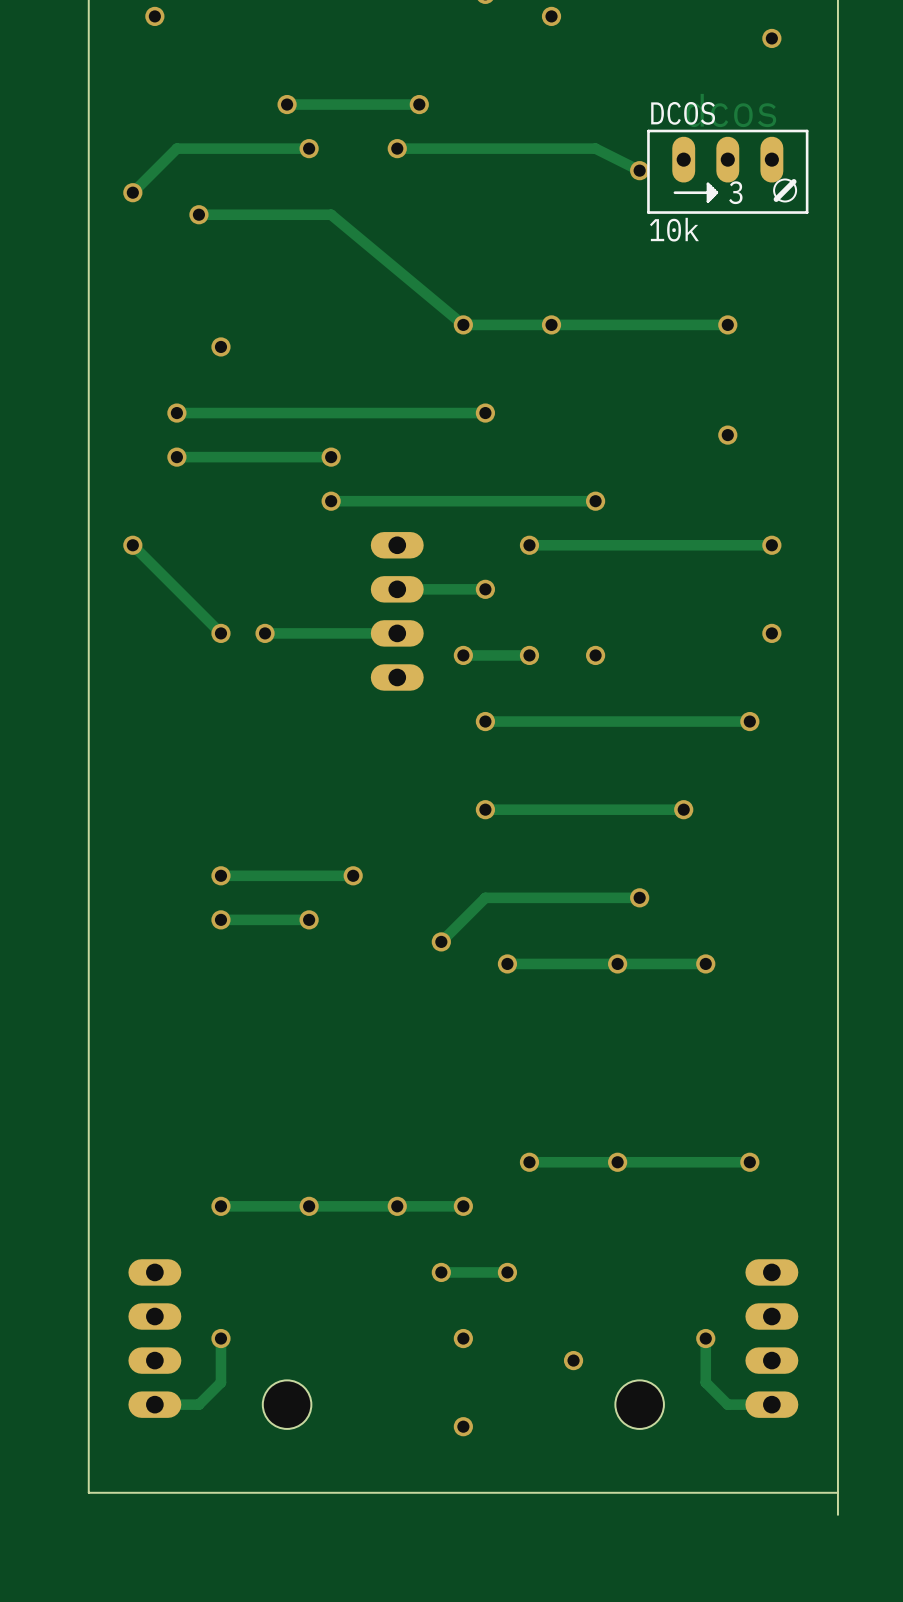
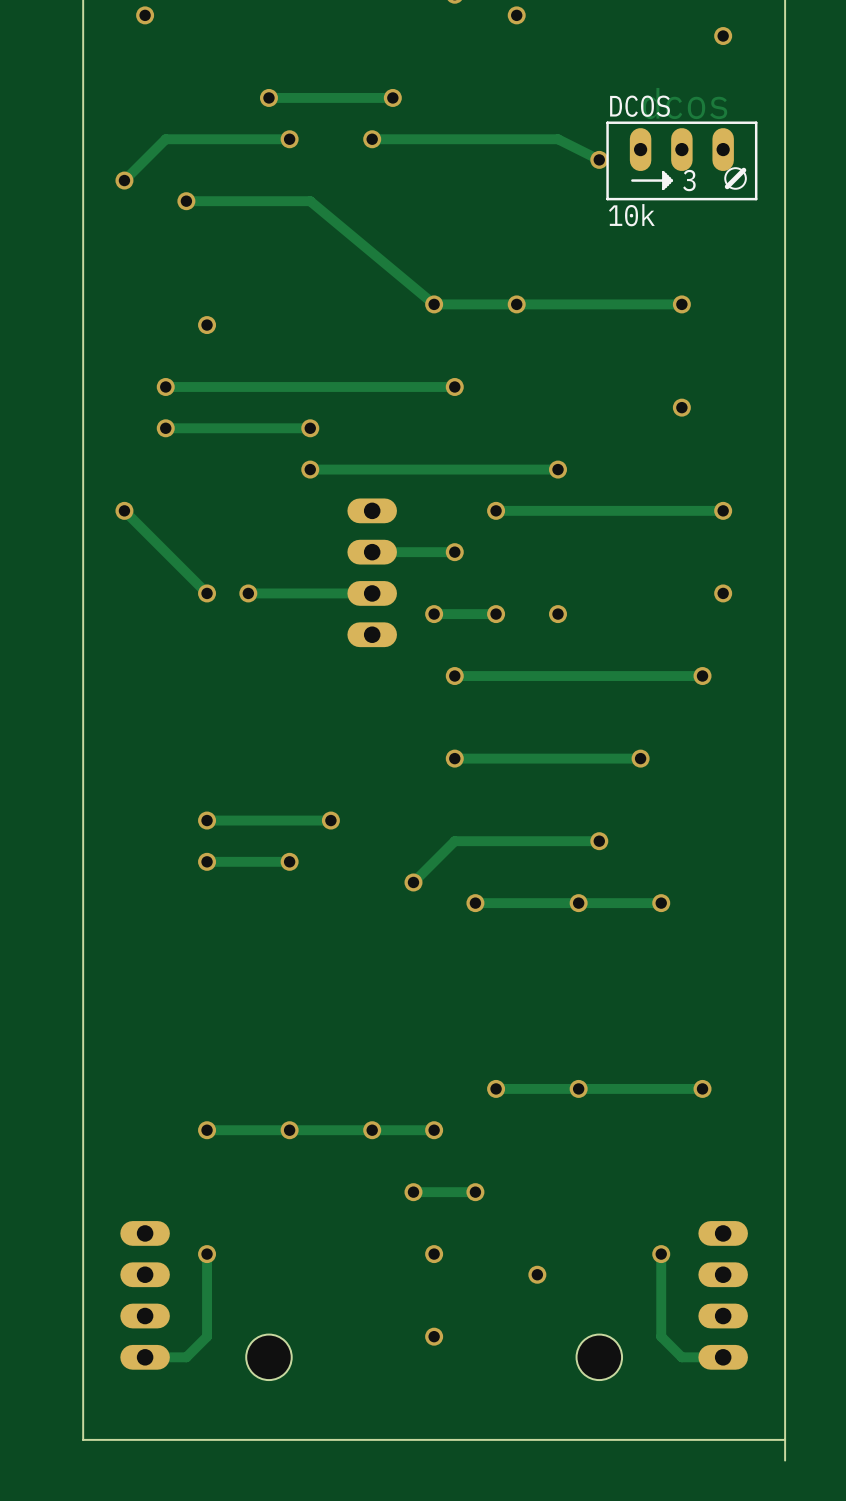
part position: (154, 1338) -> (145, 1295)
part position: (771, 1338) -> (723, 1295)
track: (220, 1382) (198, 1404) (154, 1404) -> (207, 1295) (207, 1336) (186, 1357) (145, 1357)
track: (705, 1382) (727, 1404) (771, 1404) -> (661, 1295) (661, 1336) (681, 1357) (723, 1357)
hole position: (287, 1404) -> (268, 1357)
hole position: (639, 1404) -> (599, 1357)
board edge: (837, 1492) (88, 1492) -> (785, 1439) (83, 1439) (83, 1398)
board edge: none -> (785, 1419) (785, 1460)

